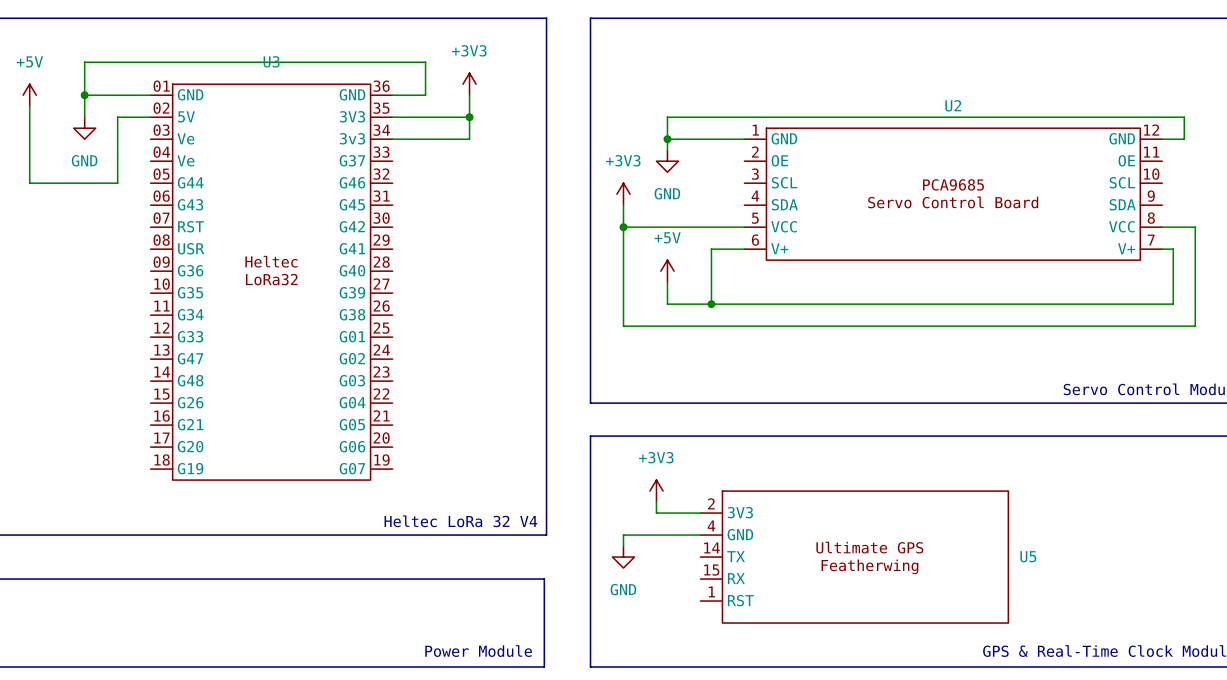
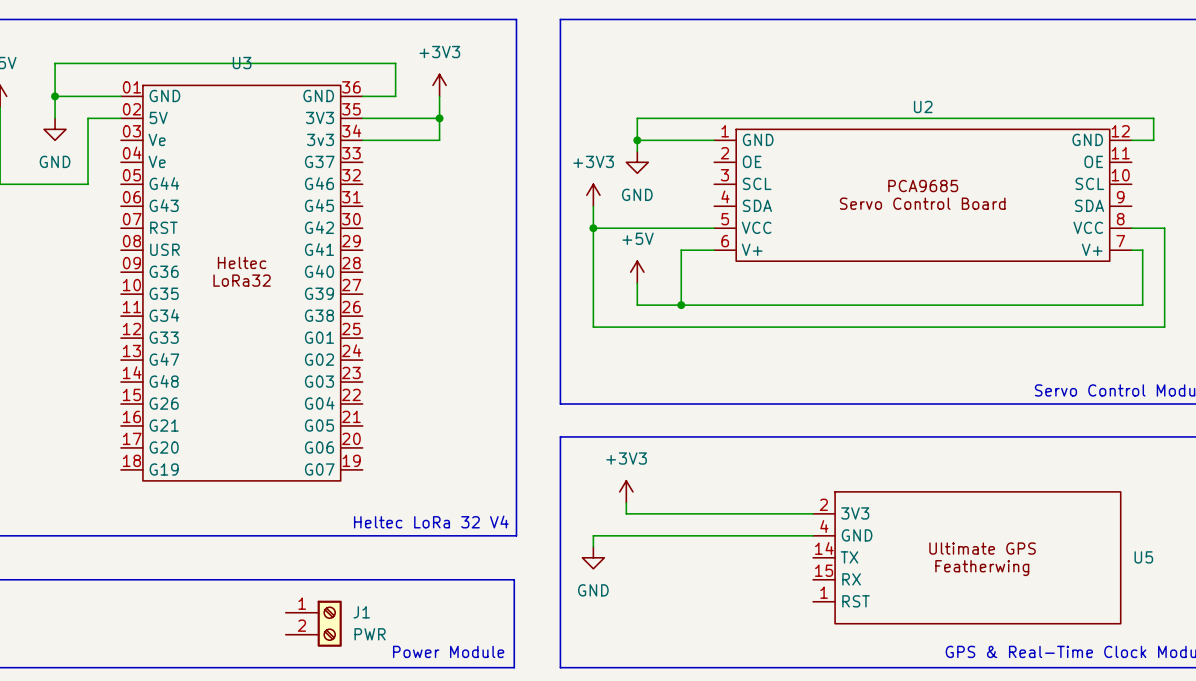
wire: none -> (670, 513) (813, 513)
wire: none -> (670, 535) (813, 535)
U5 position: (854, 557) -> (966, 557)
J1: none -> PWR (313, 623)

